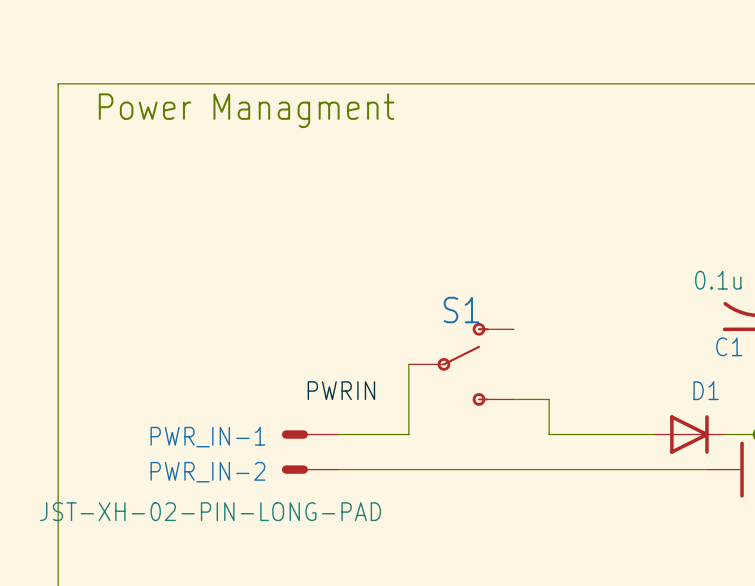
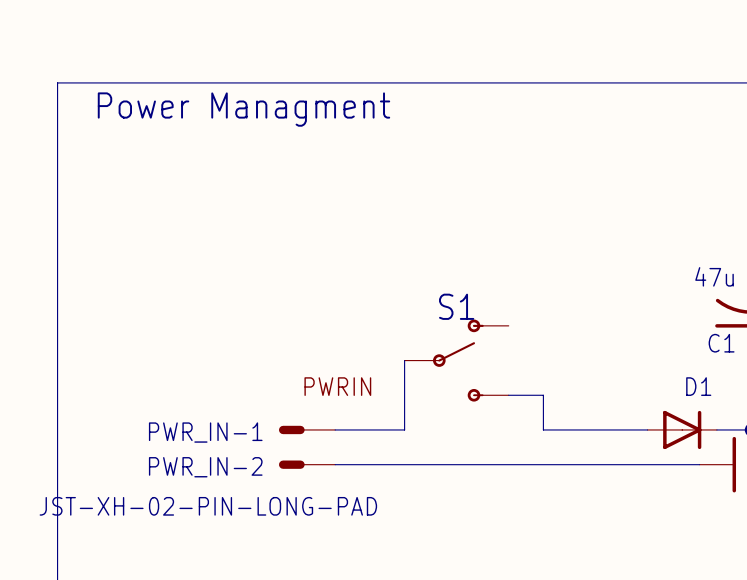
C1 value: 0.1u (718, 280) -> 47u (714, 276)

